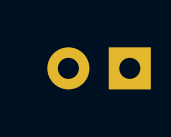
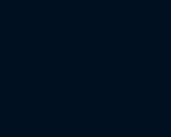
part: (99, 68) -> none

